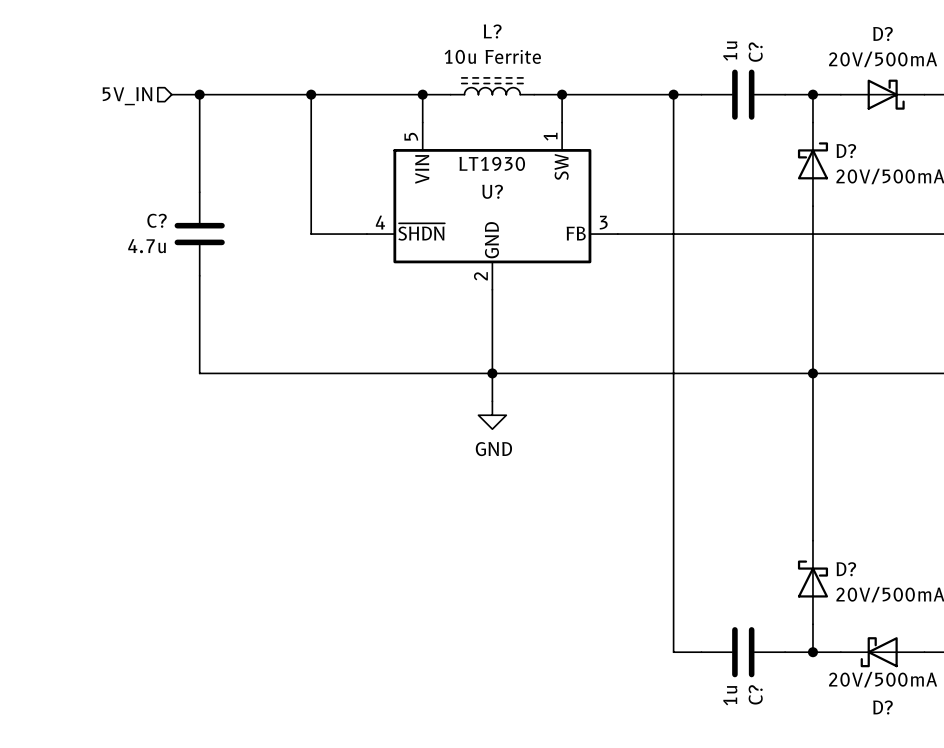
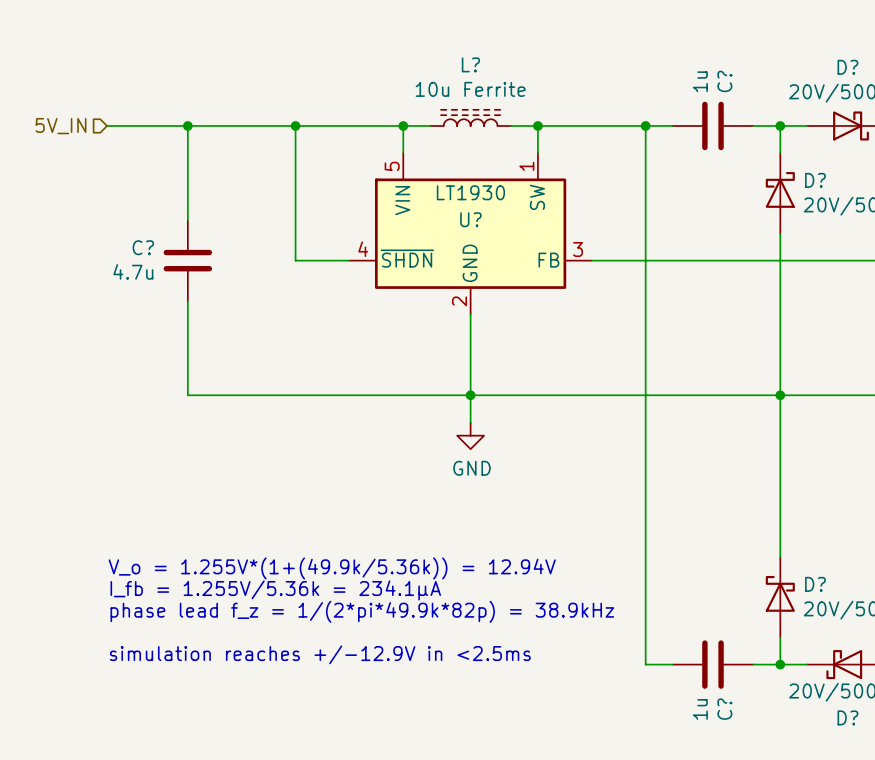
wire: none -> (107, 125) (160, 125)
hierarchical label position: 5V_IN (127, 96) -> 5V_IN (60, 126)
text: none -> V_o = 1.255V*(1+(49.9k/5.36k)) = 12.94V (332, 568)
text: none -> I_fb = 1.255V/5.36k = 234.1µA (275, 590)
text: none -> phase lead f_z = 1/(2*pi*49.9k*82p) = 38.9kHz (362, 611)
text: none -> simulation reaches +/-12.9V in <2.5ms (320, 654)

